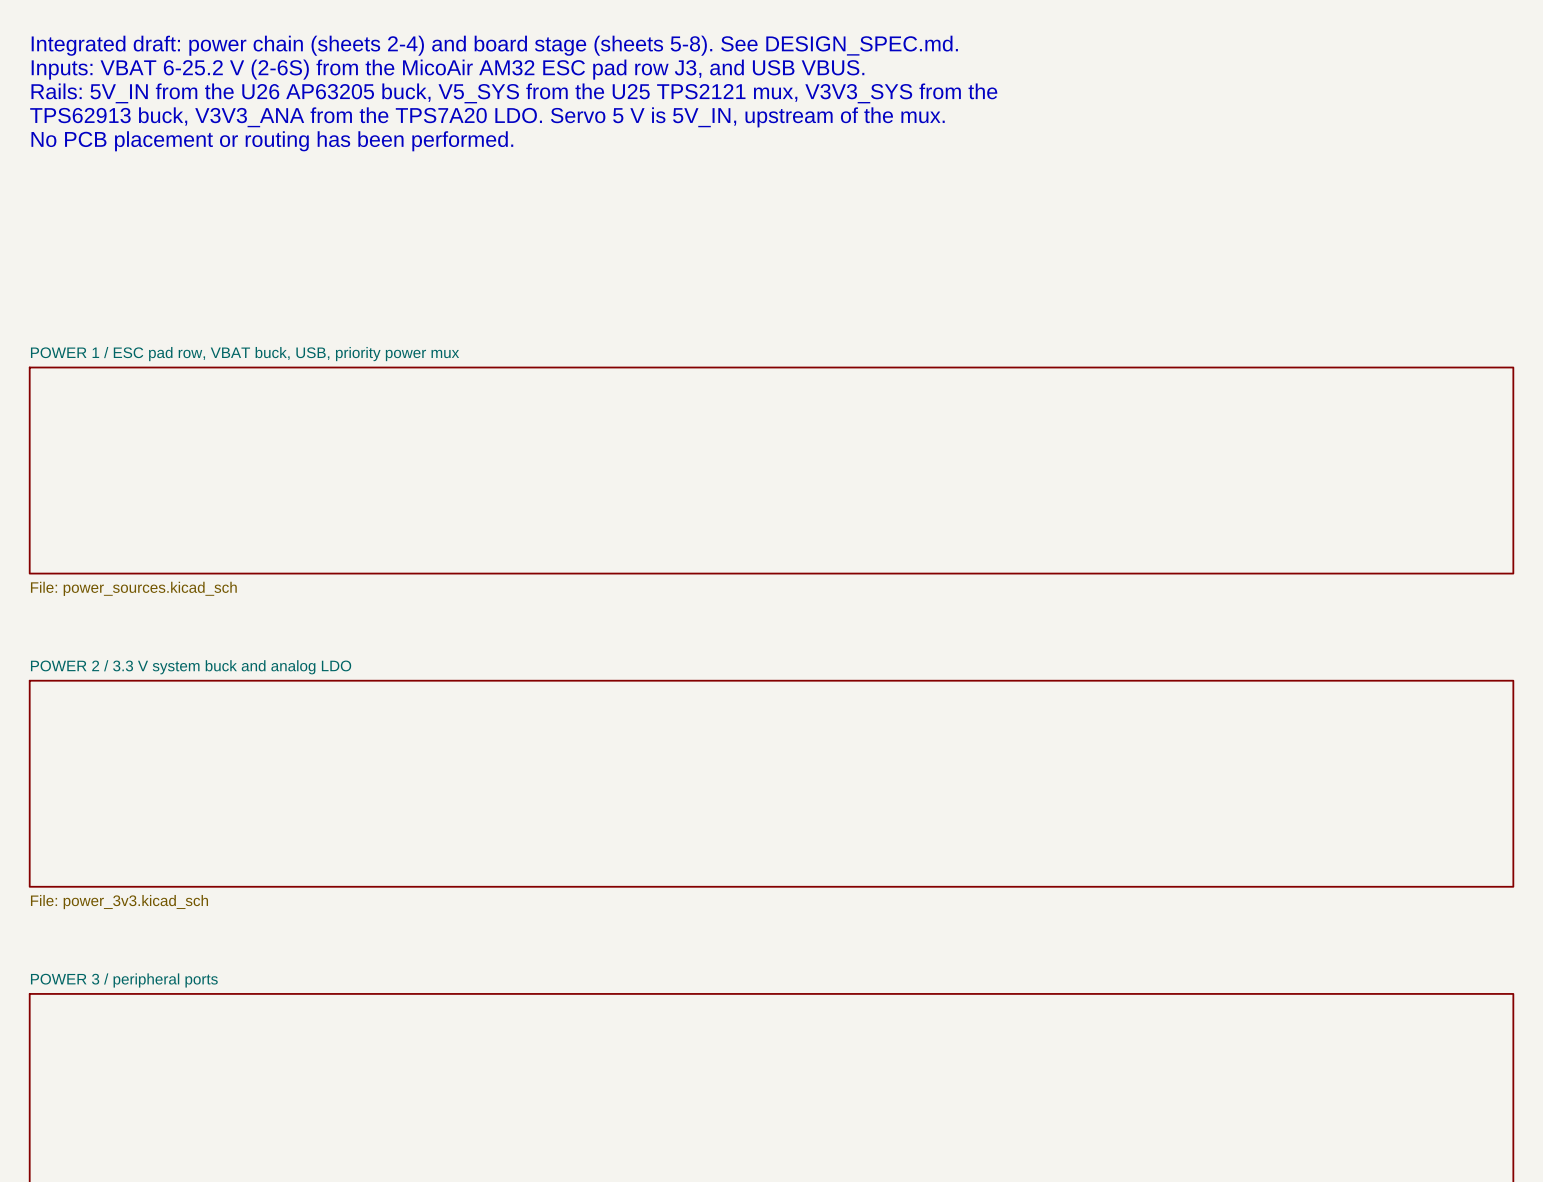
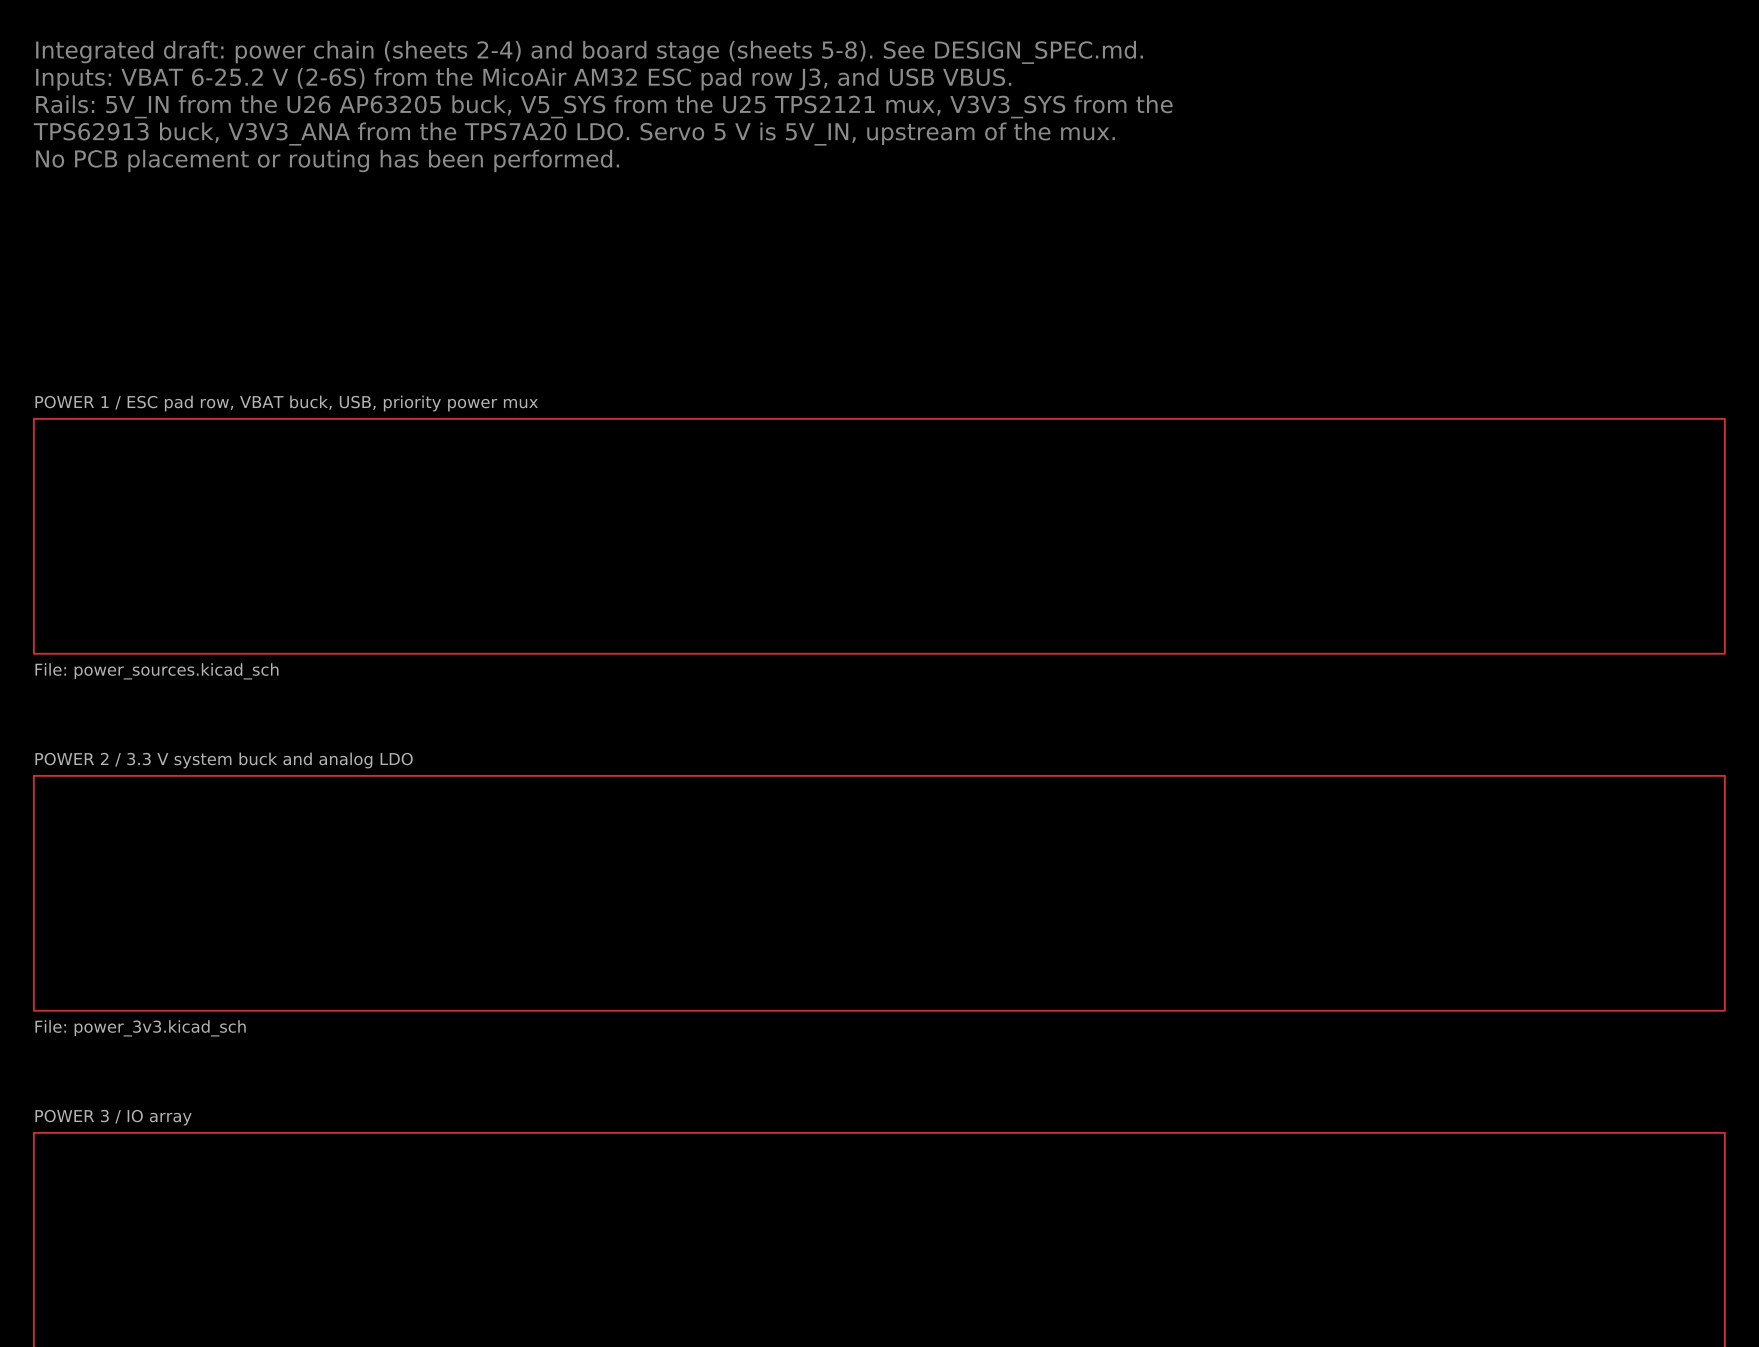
sheet POWER 3 / peripheral ports name: POWER 3 / peripheral ports (124, 980) -> POWER 3 / IO array (113, 1117)

